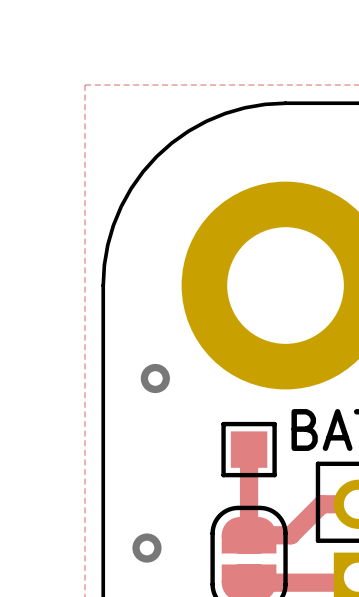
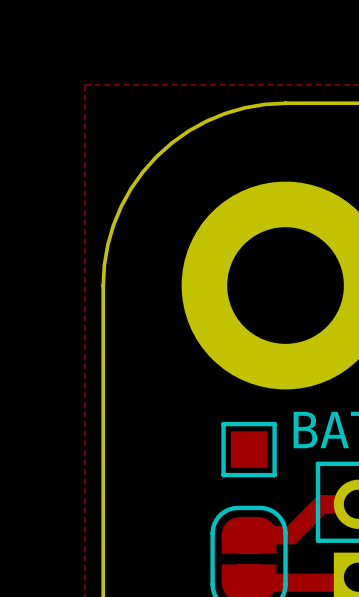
via: (155, 378) -> none
track: (249, 449) (249, 535) -> none
via: (146, 548) -> none

